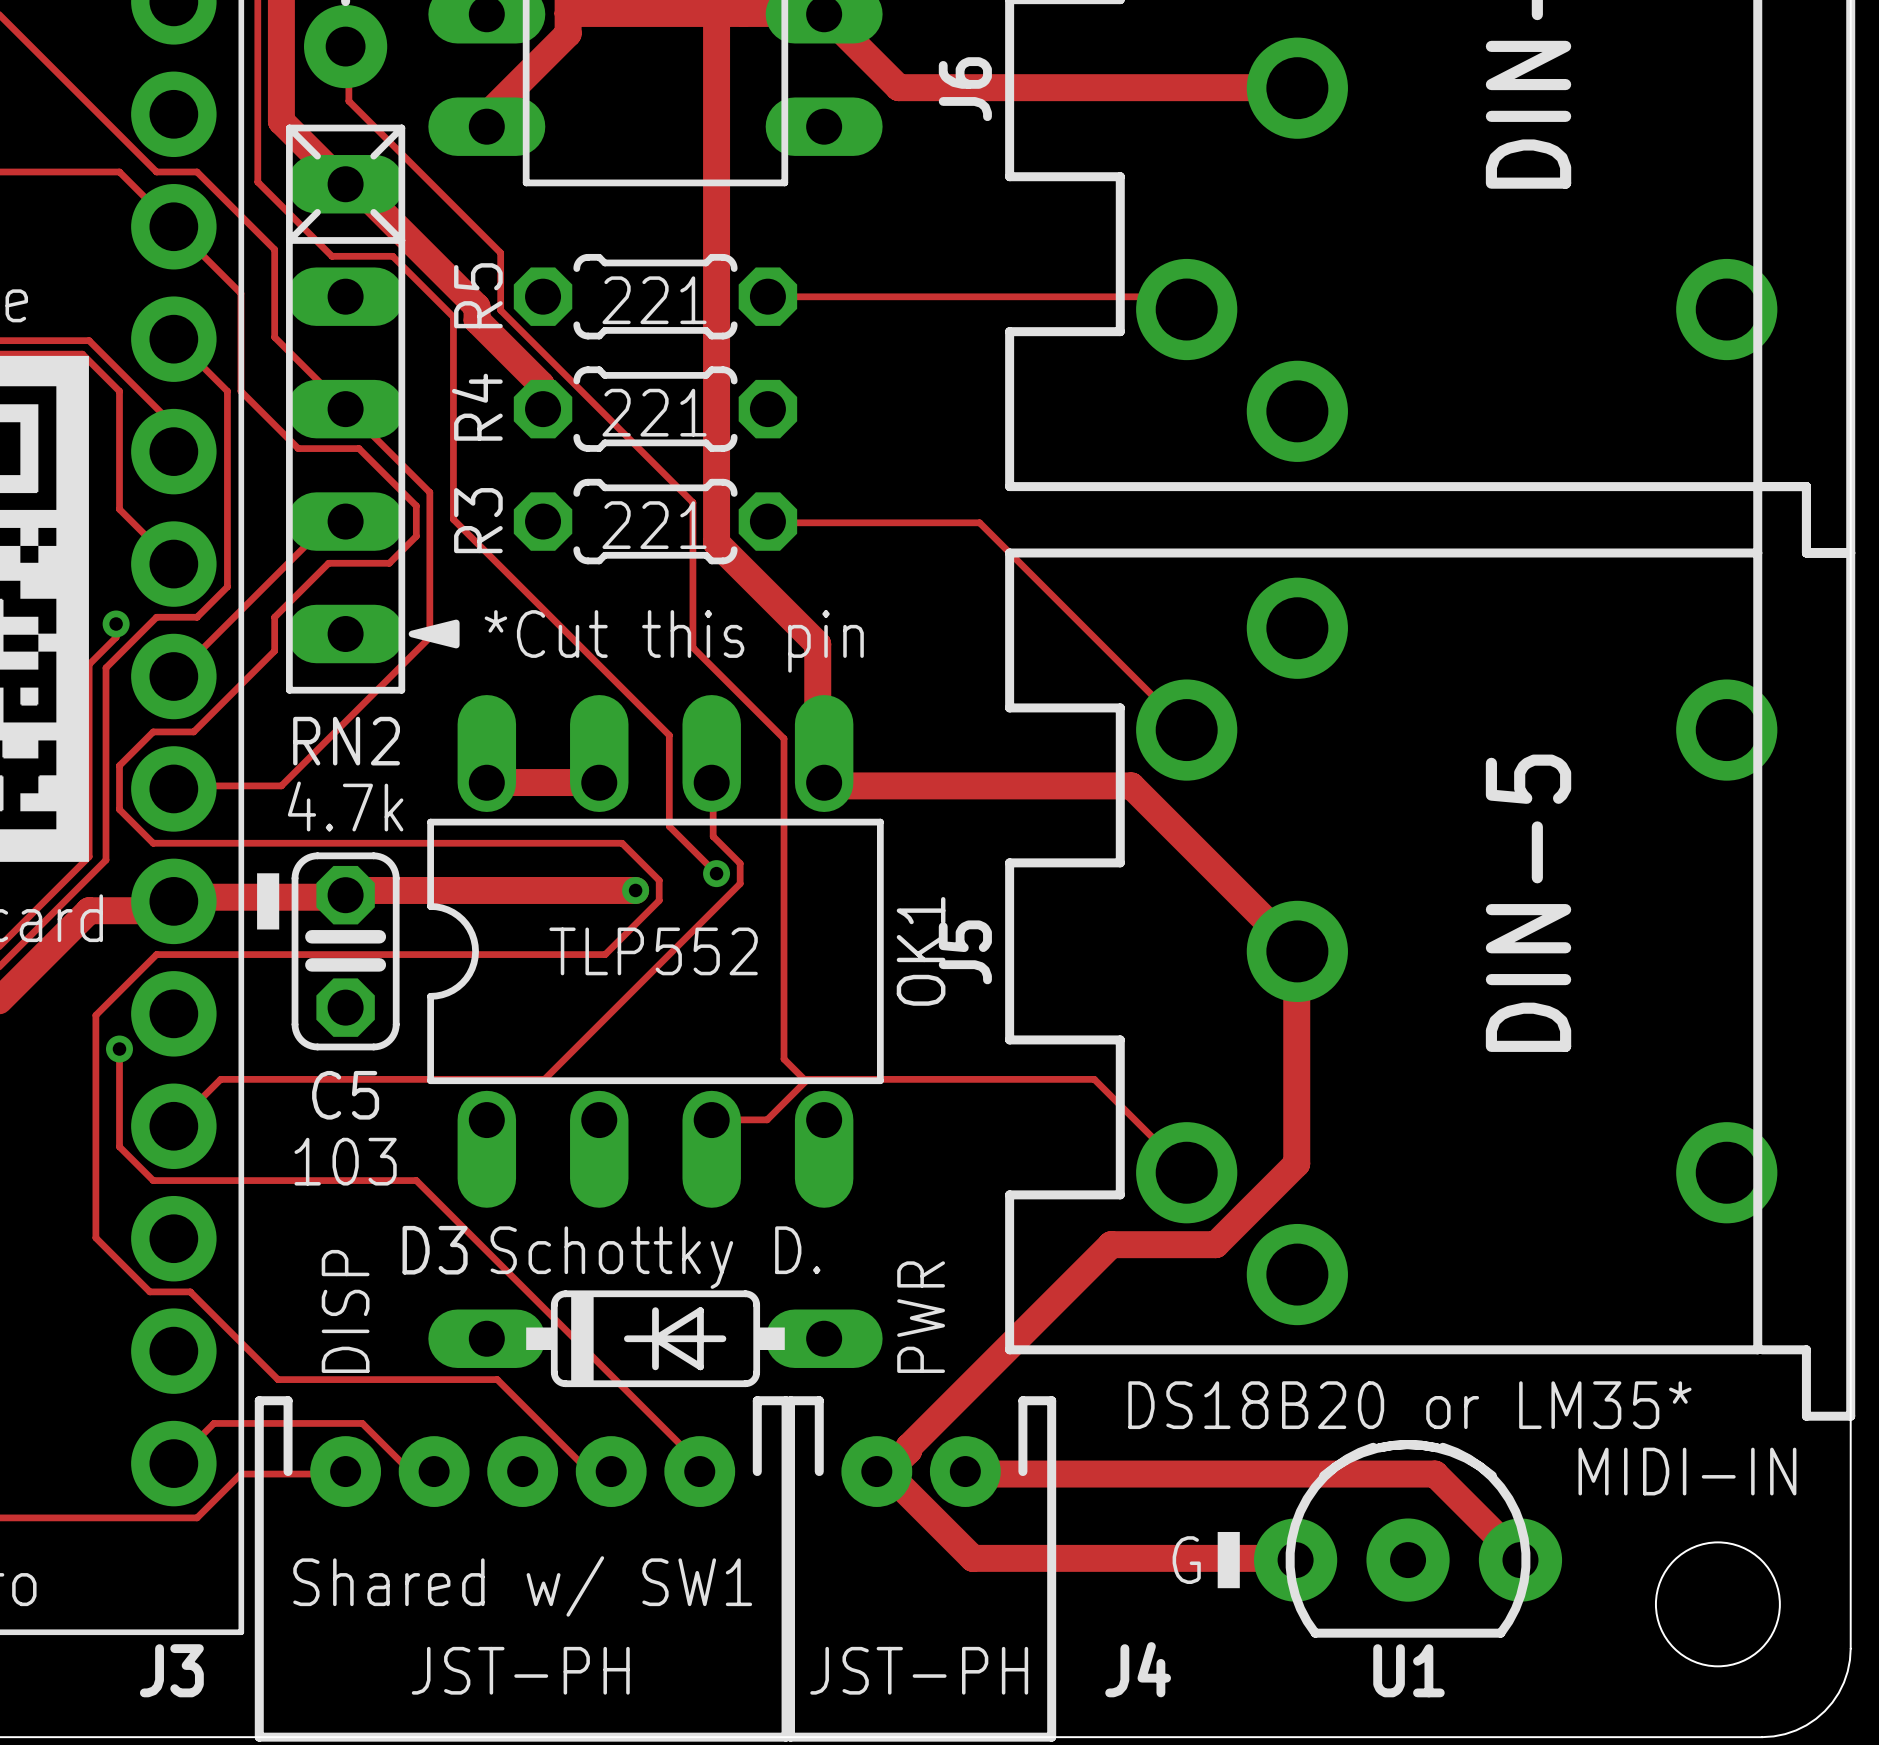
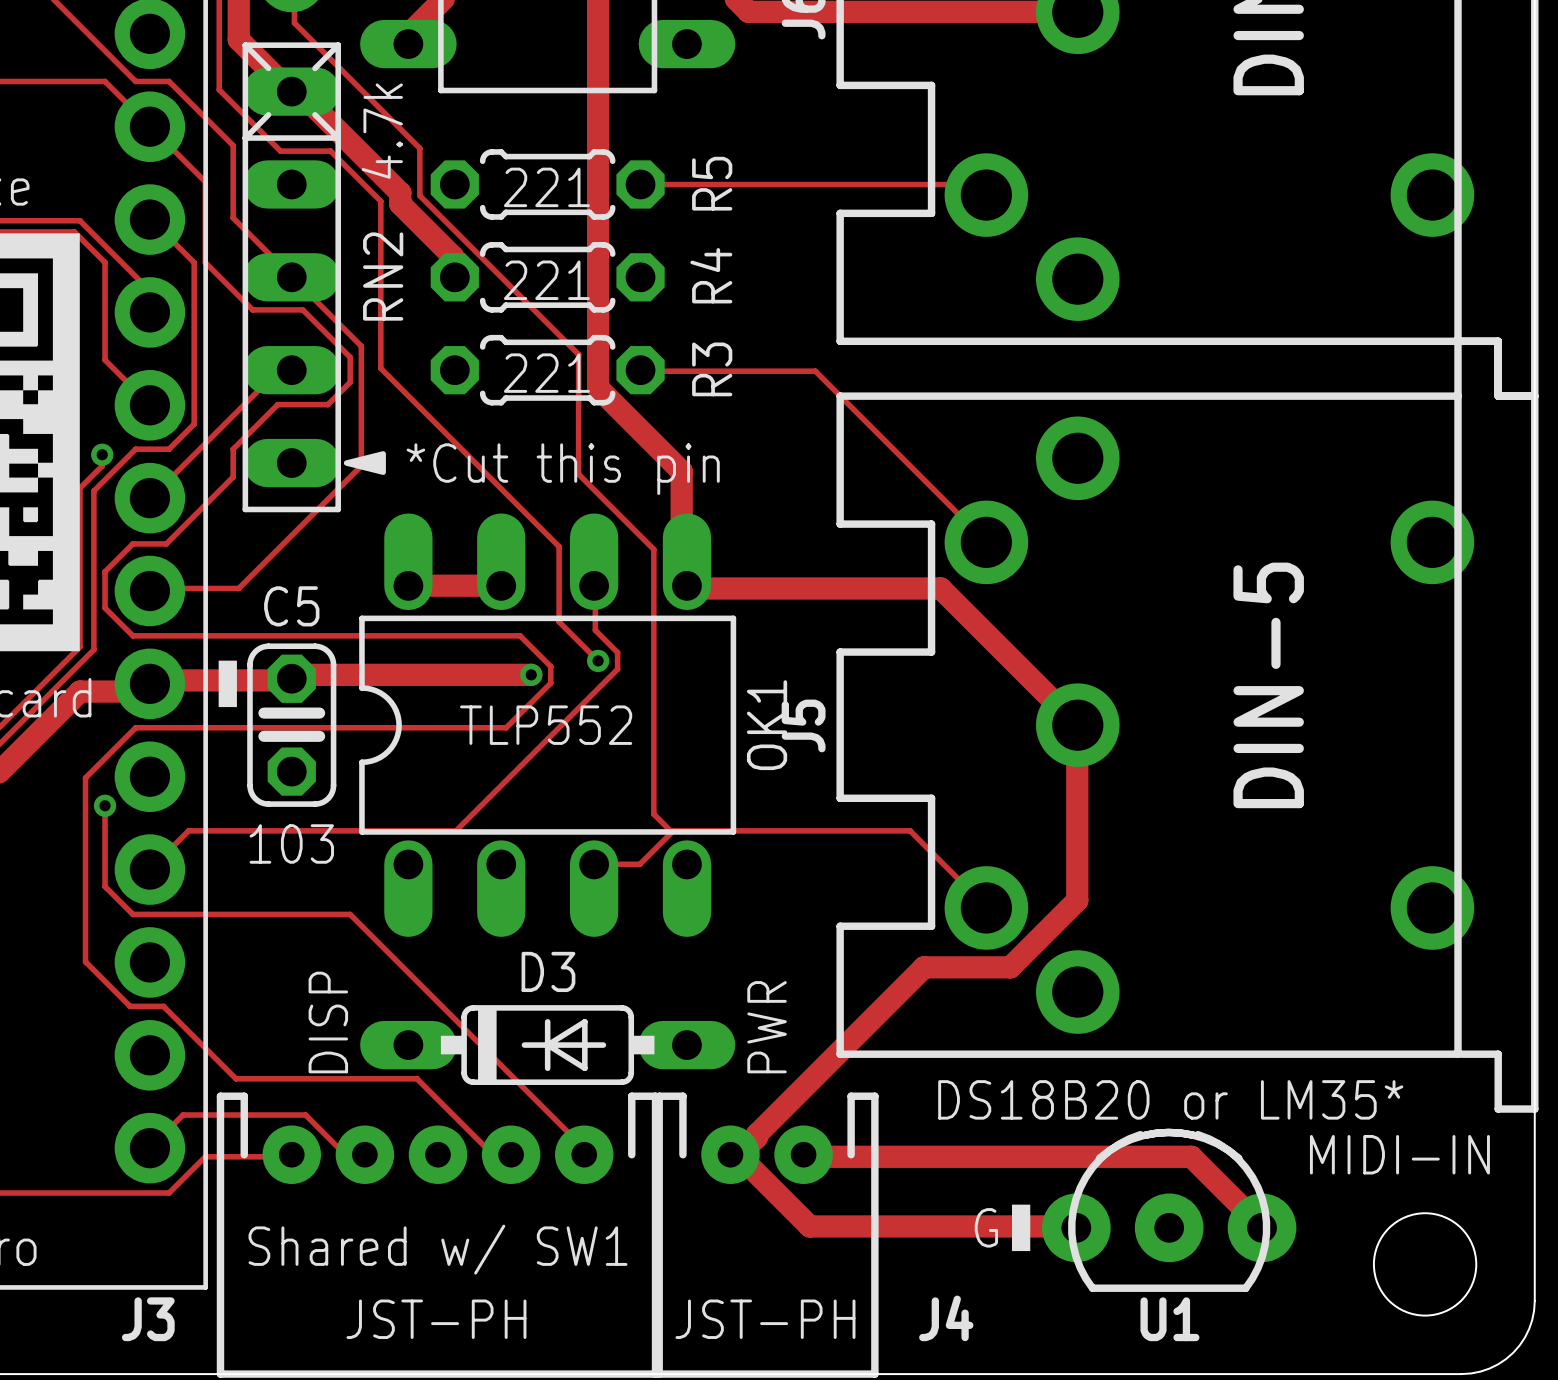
R5 name position: R5 (478, 295) -> R5 (712, 183)
R4 name position: R4 (477, 407) -> R4 (711, 275)
R3 name position: R3 (478, 520) -> R3 (712, 369)
RN2 name rotation: 0° (346, 741) -> 90° counterclockwise (383, 276)
RN2 name position: RN2 (346, 741) -> RN2 (383, 276)
text rotation: 0° (345, 806) -> 90° counterclockwise (382, 131)
text position: 4.7k (345, 806) -> 4.7k (382, 131)
C5 name position: C5 (345, 1095) -> C5 (291, 606)
text position: 103 (345, 1161) -> 103 (291, 843)
D3 name position: D3 (435, 1250) -> D3 (548, 971)
text: Schottky D. (655, 1257) -> none
text position: DISP (345, 1311) -> DISP (328, 1022)

